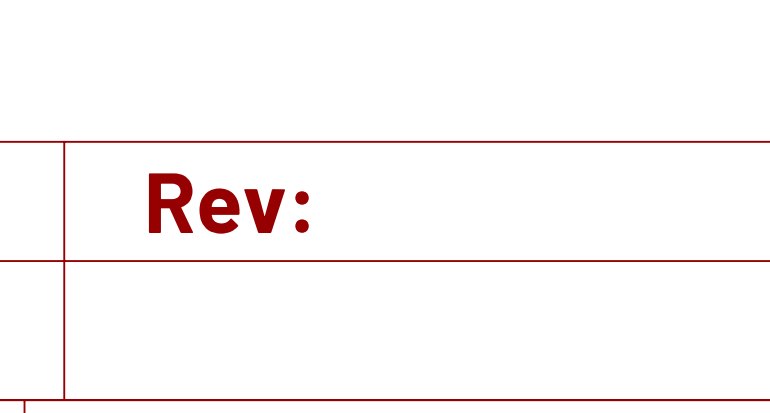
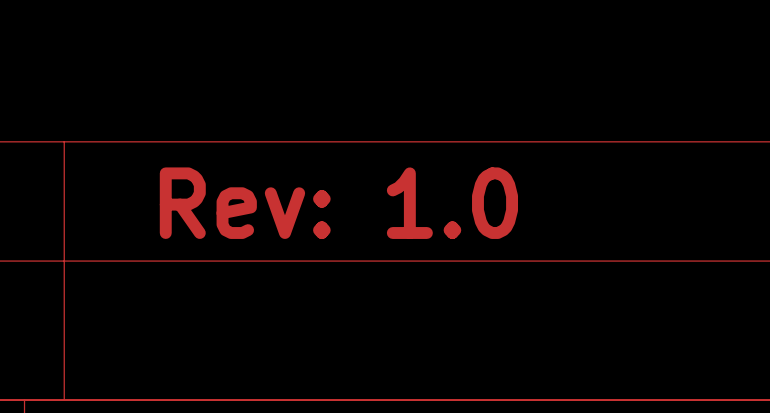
title block: Rev: (228, 203) -> Rev: 1.0 (338, 203)

